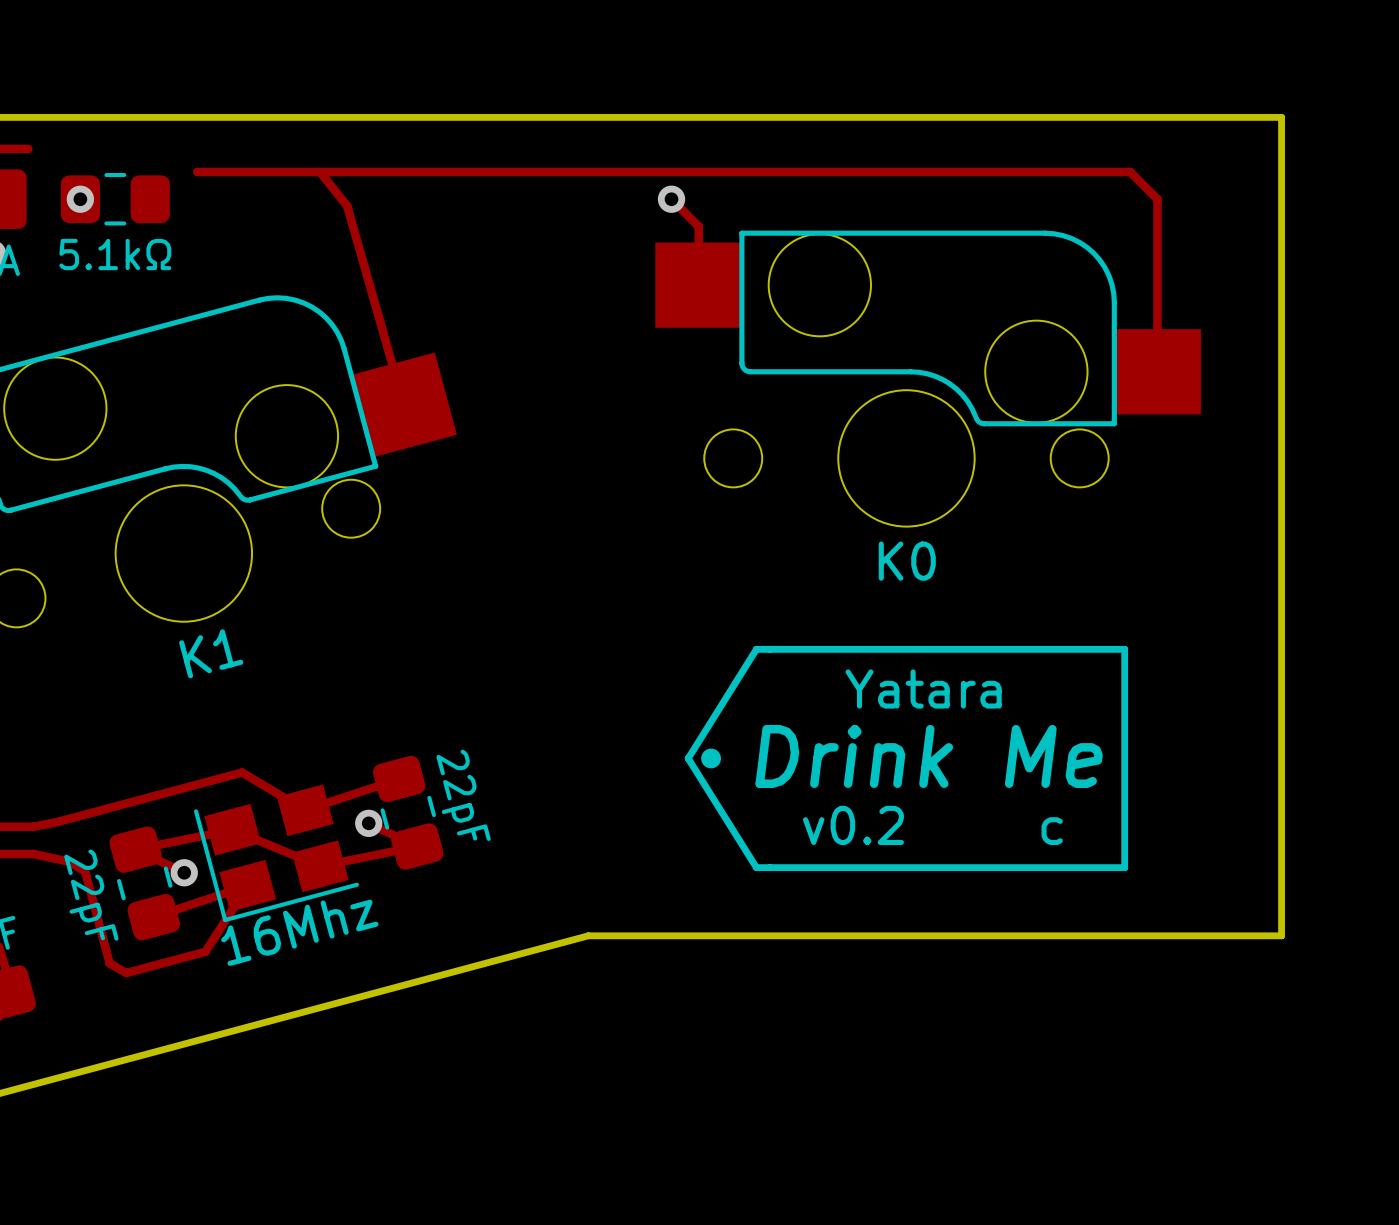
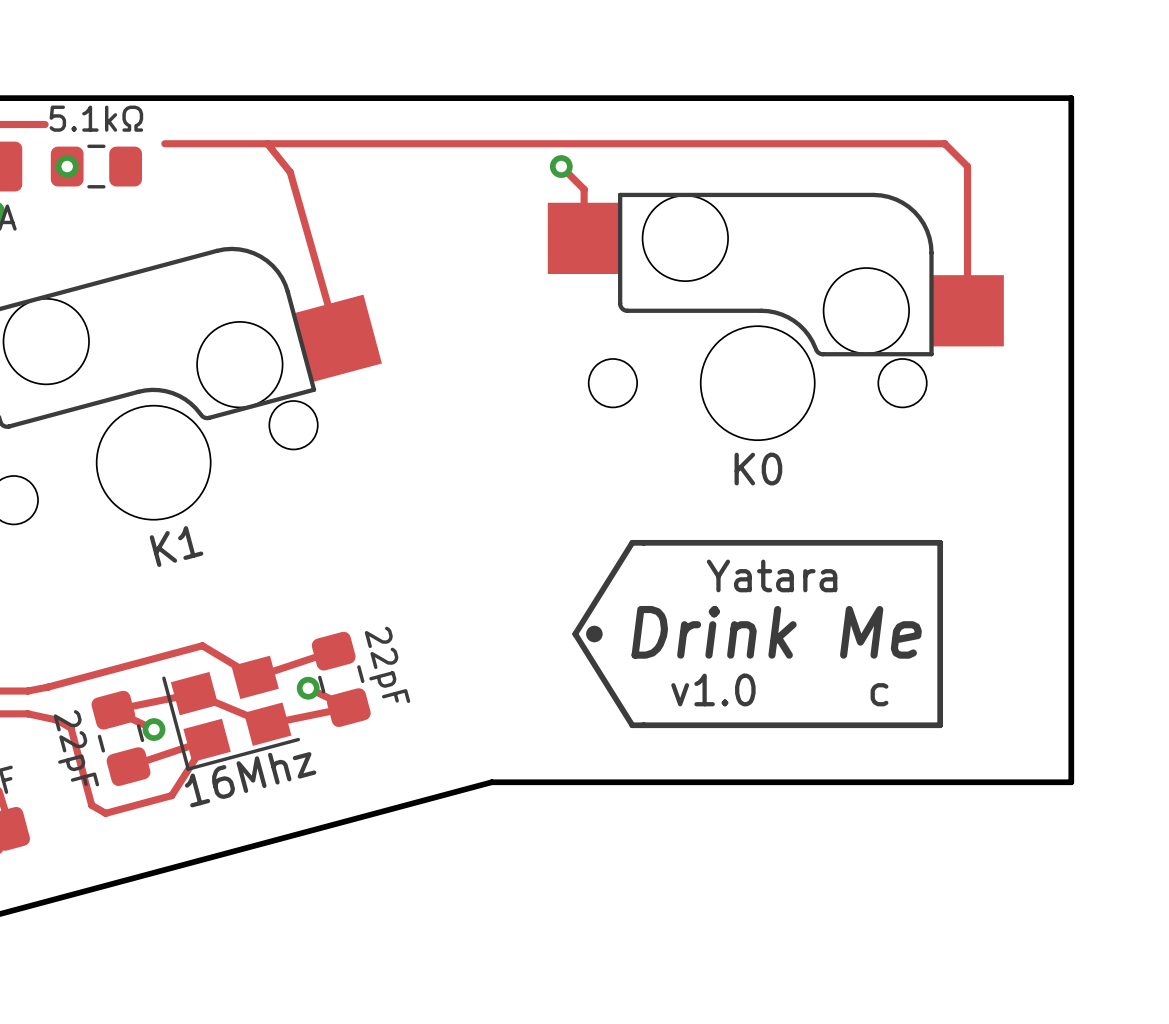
track: none -> (23, 124) (45, 124)
part value position: 5.1kΩ (115, 254) -> 5.1kΩ (96, 118)
text: v0.2 (853, 825) -> v1.0 (713, 689)

